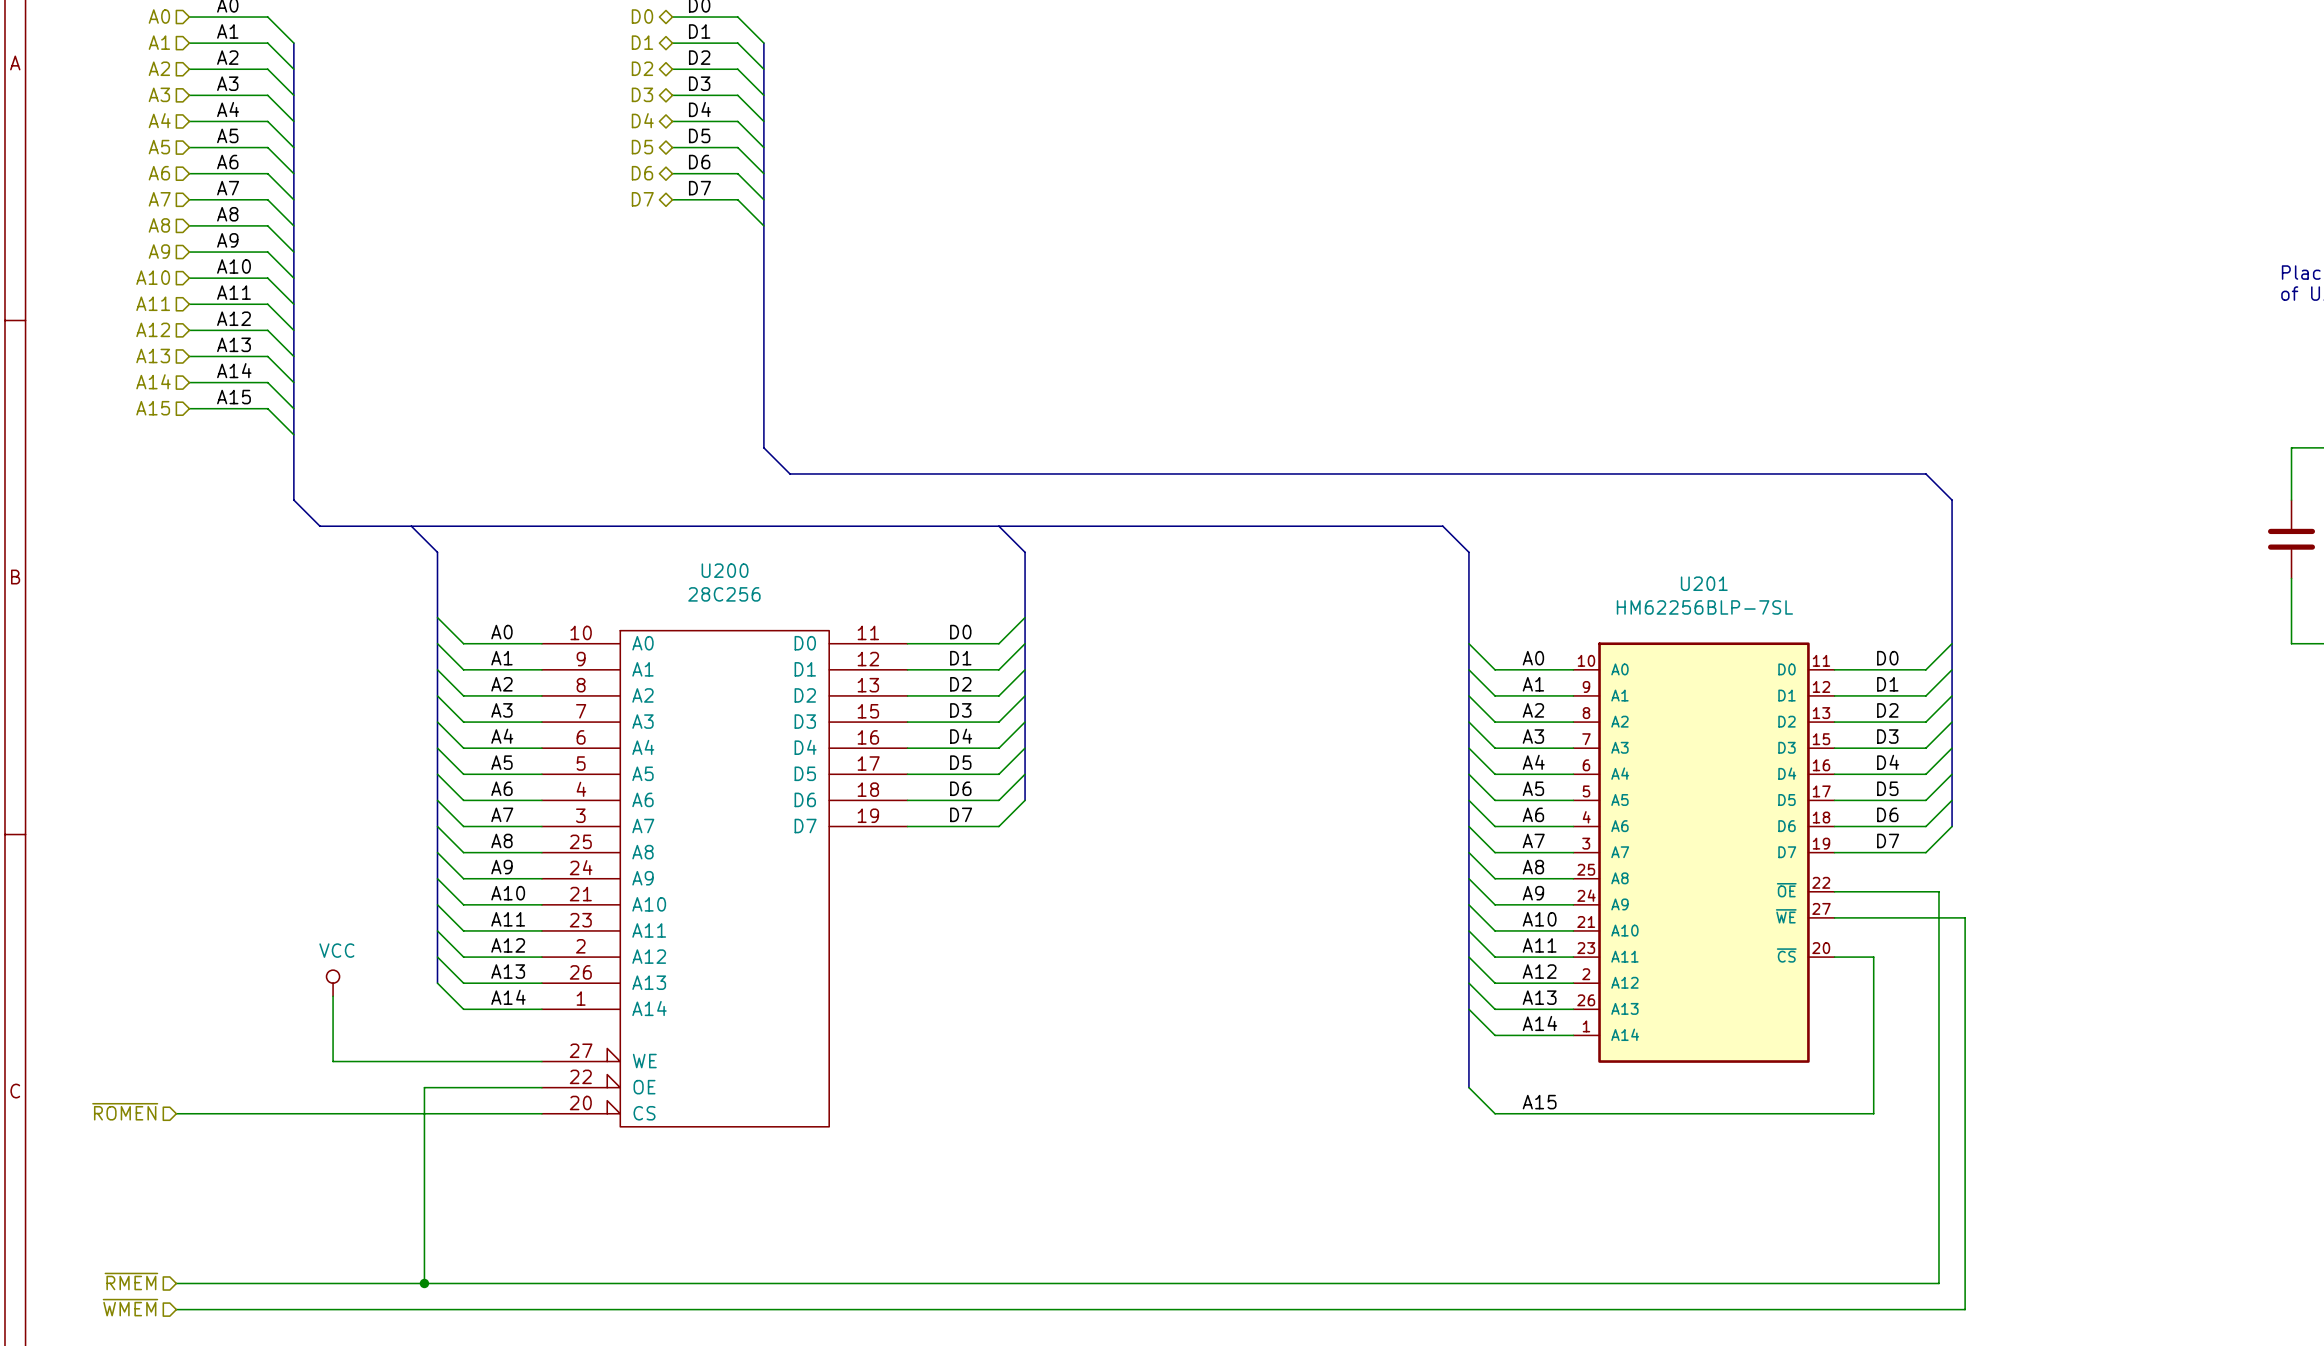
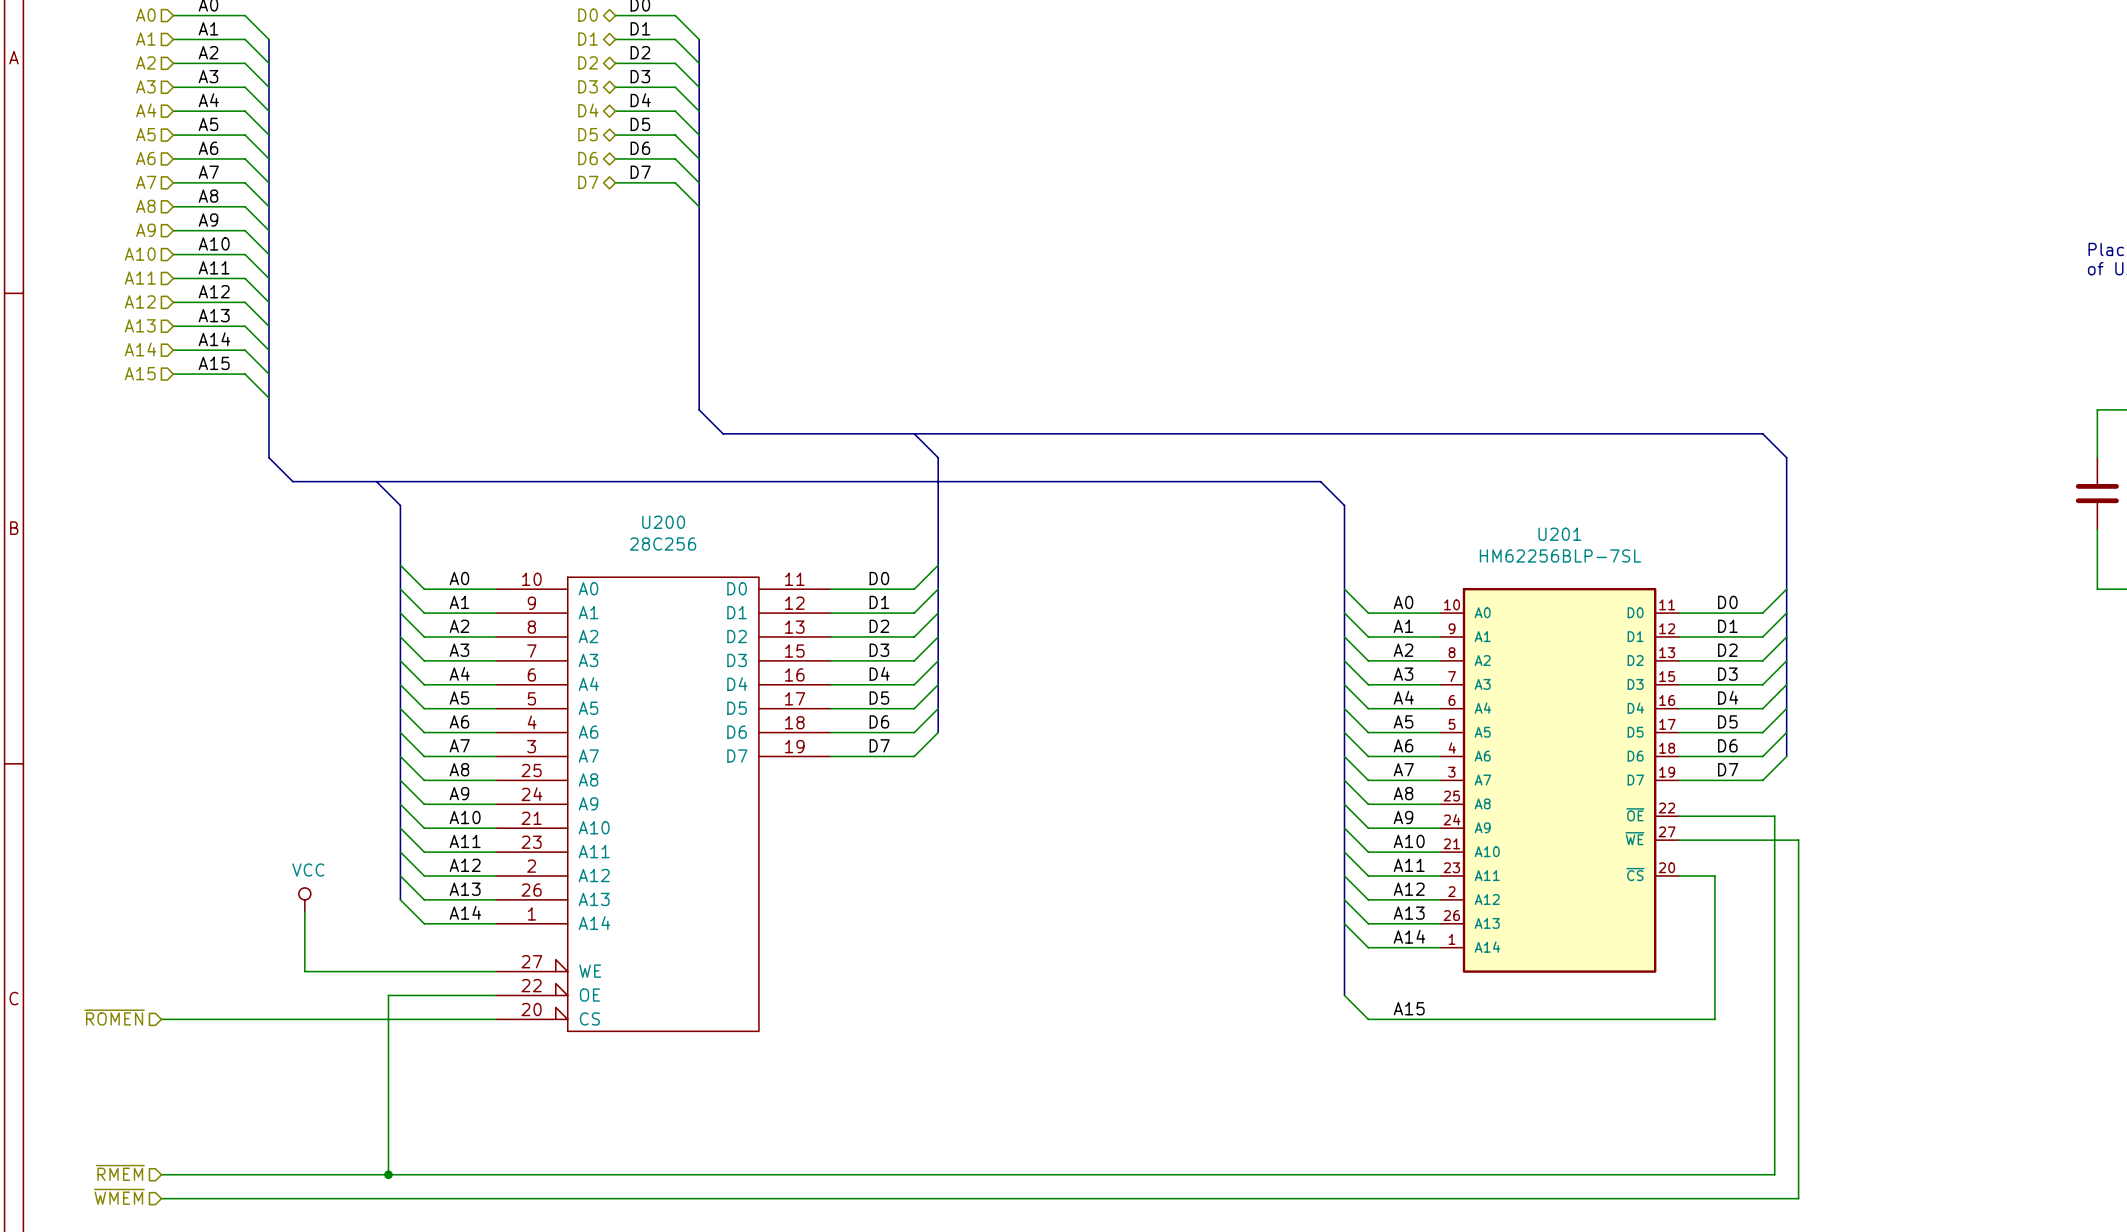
bus: (998, 526) (1025, 552) -> (914, 433) (938, 457) (938, 505)

